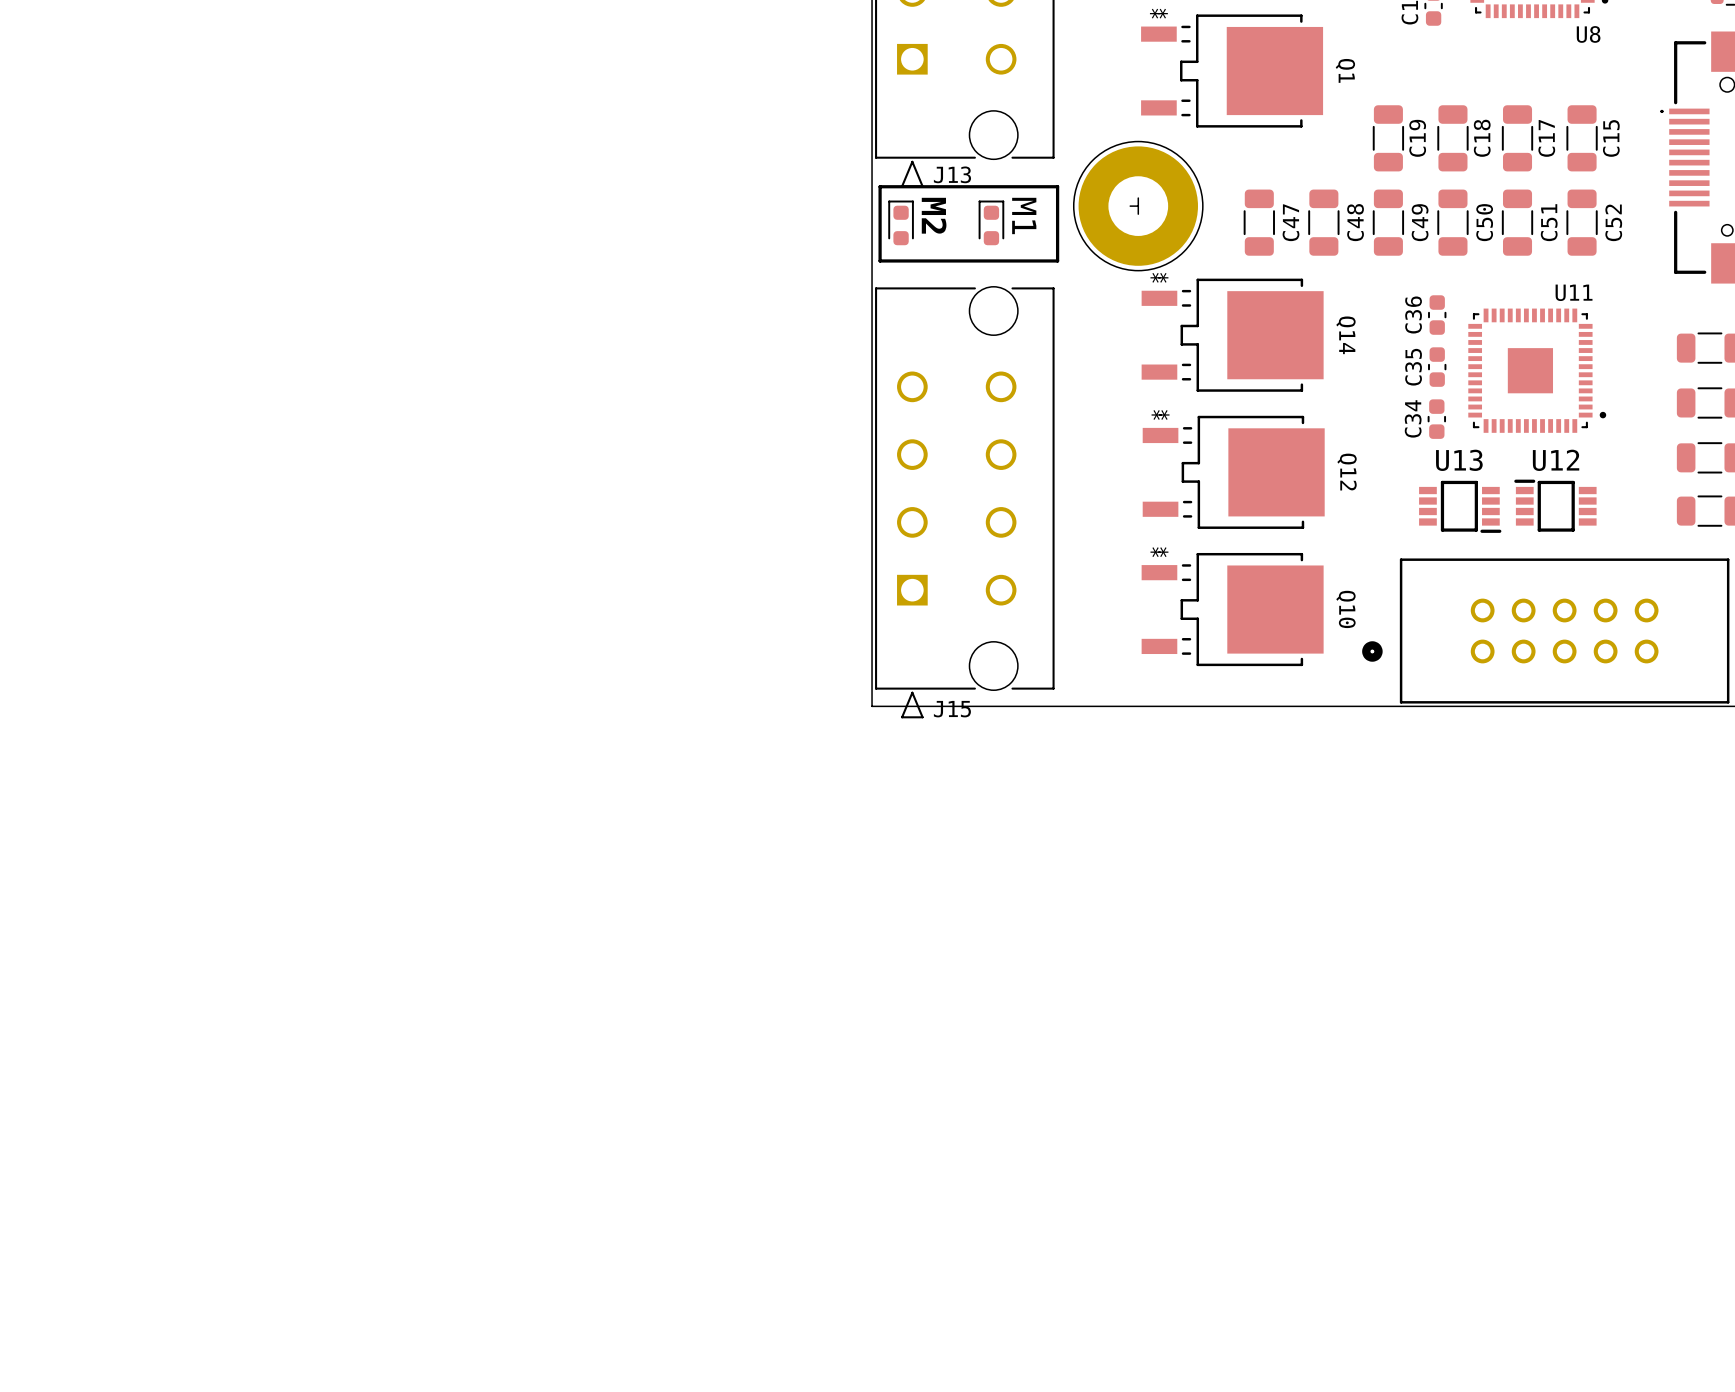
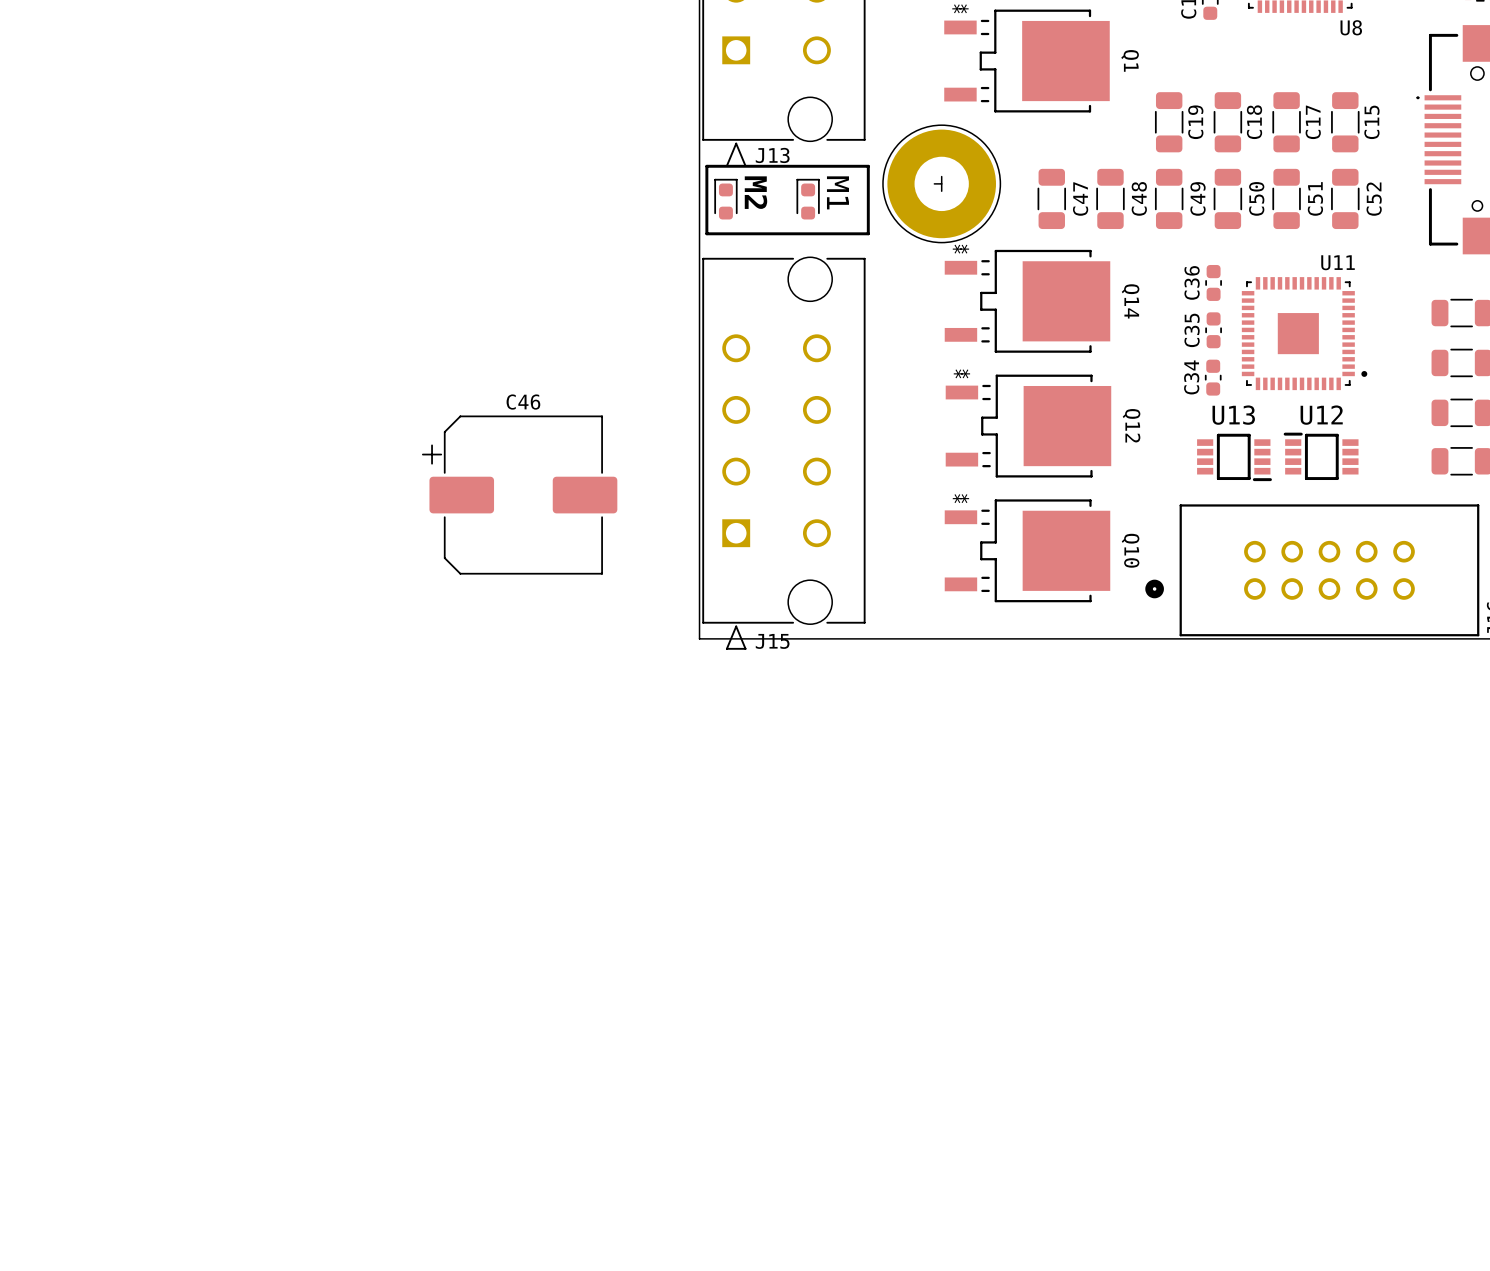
C46: none -> (519, 495)

